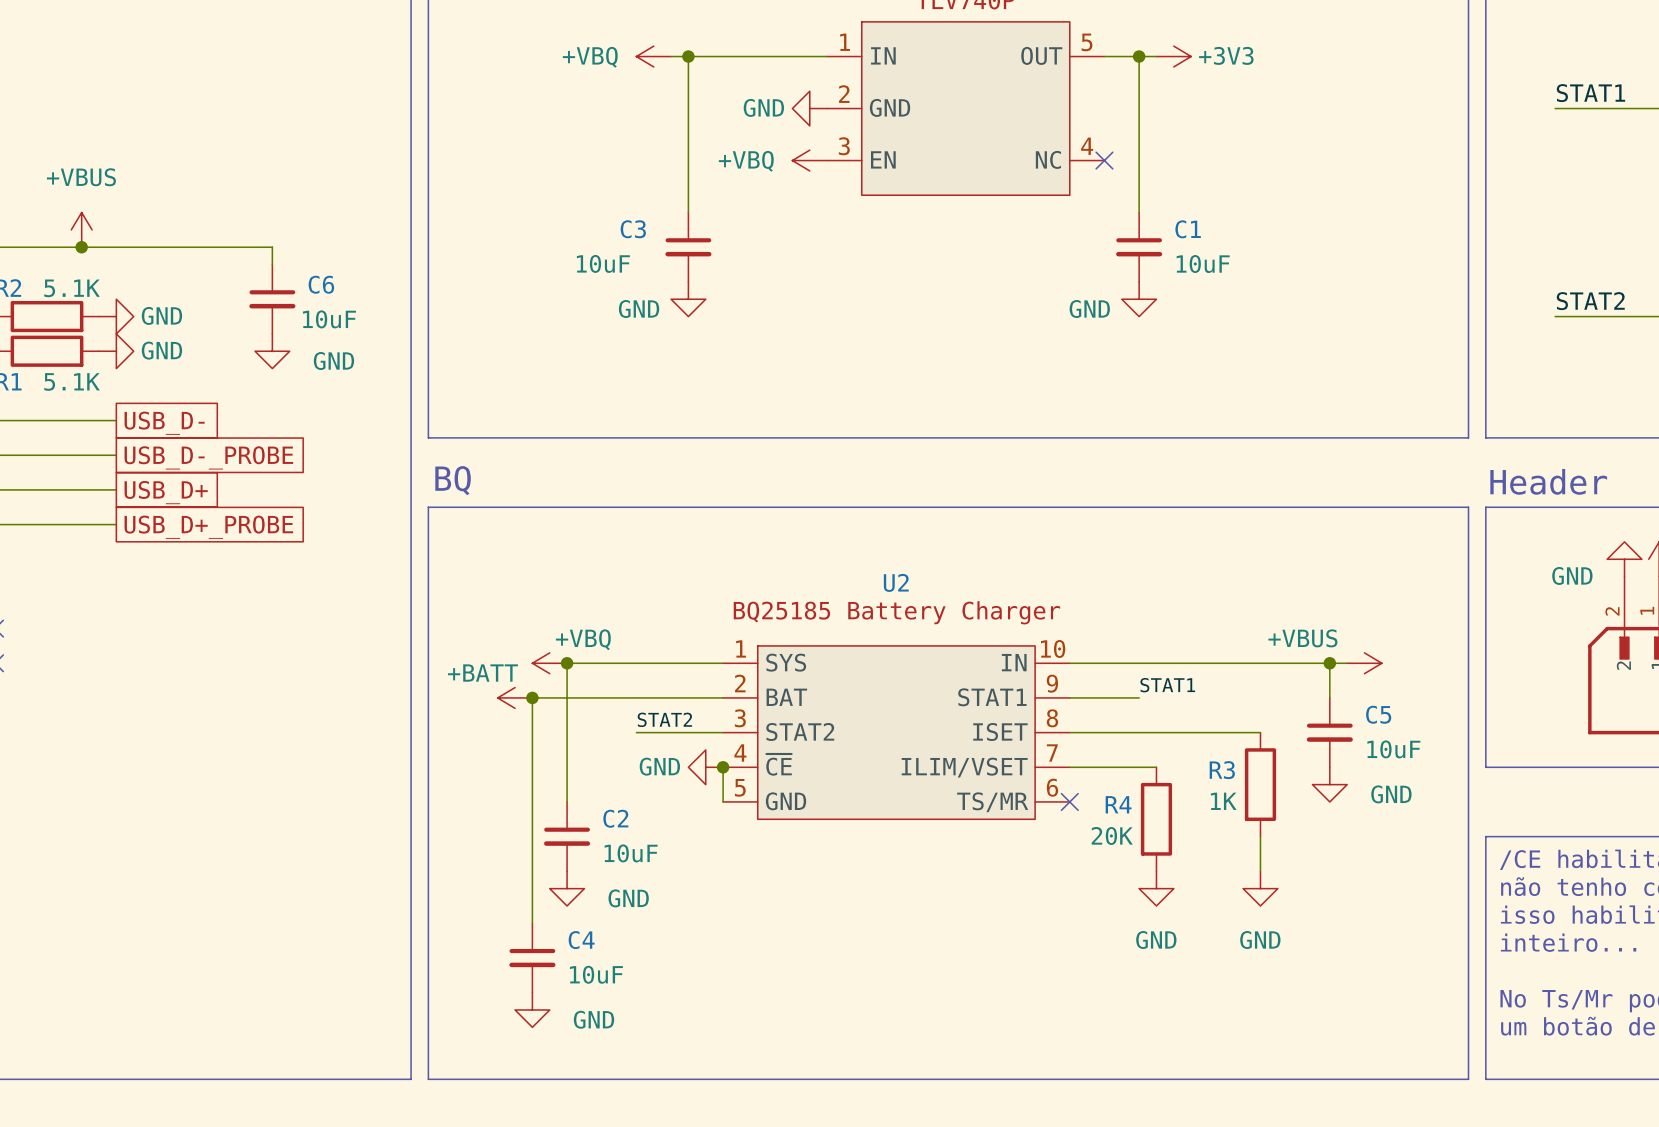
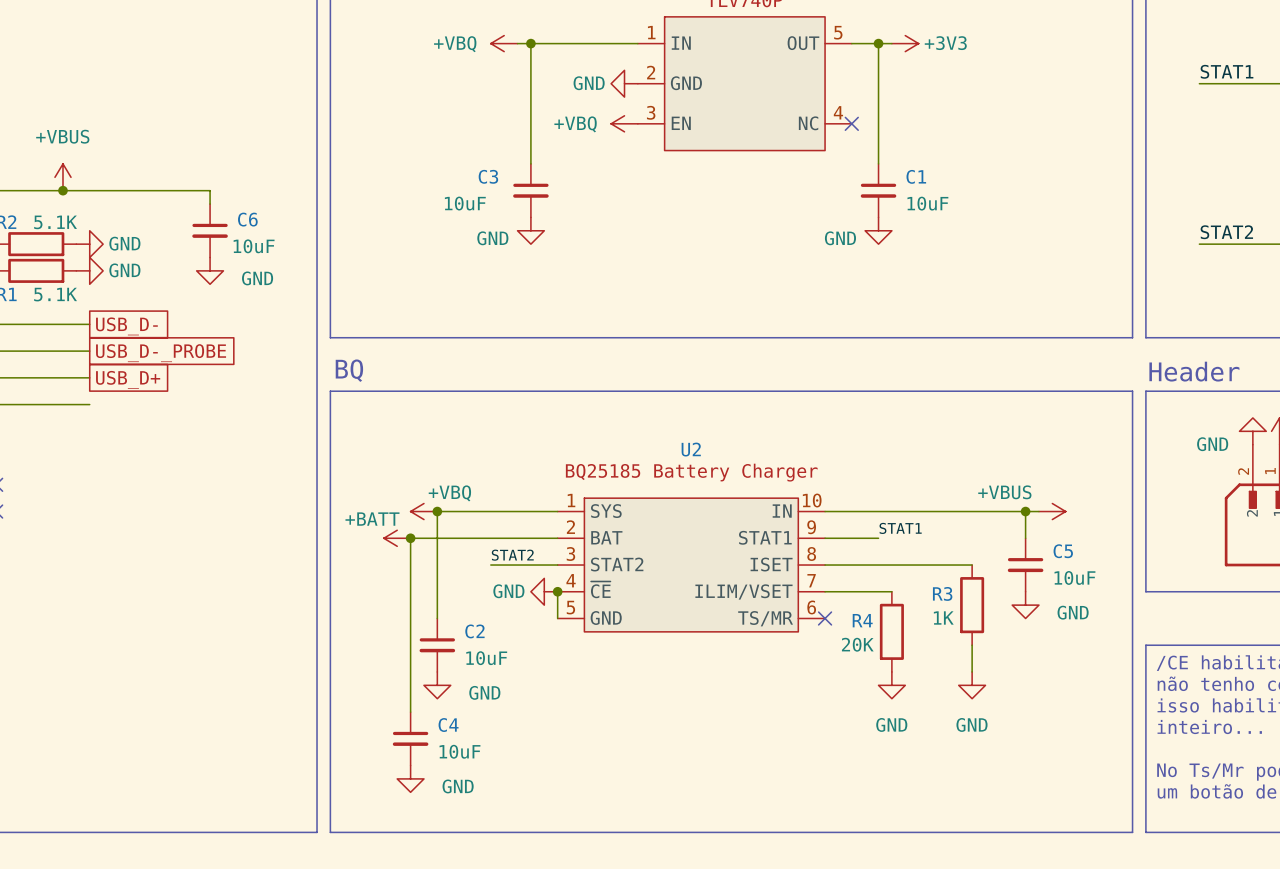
global label: USB_D+_PROBE (208, 527) -> none

